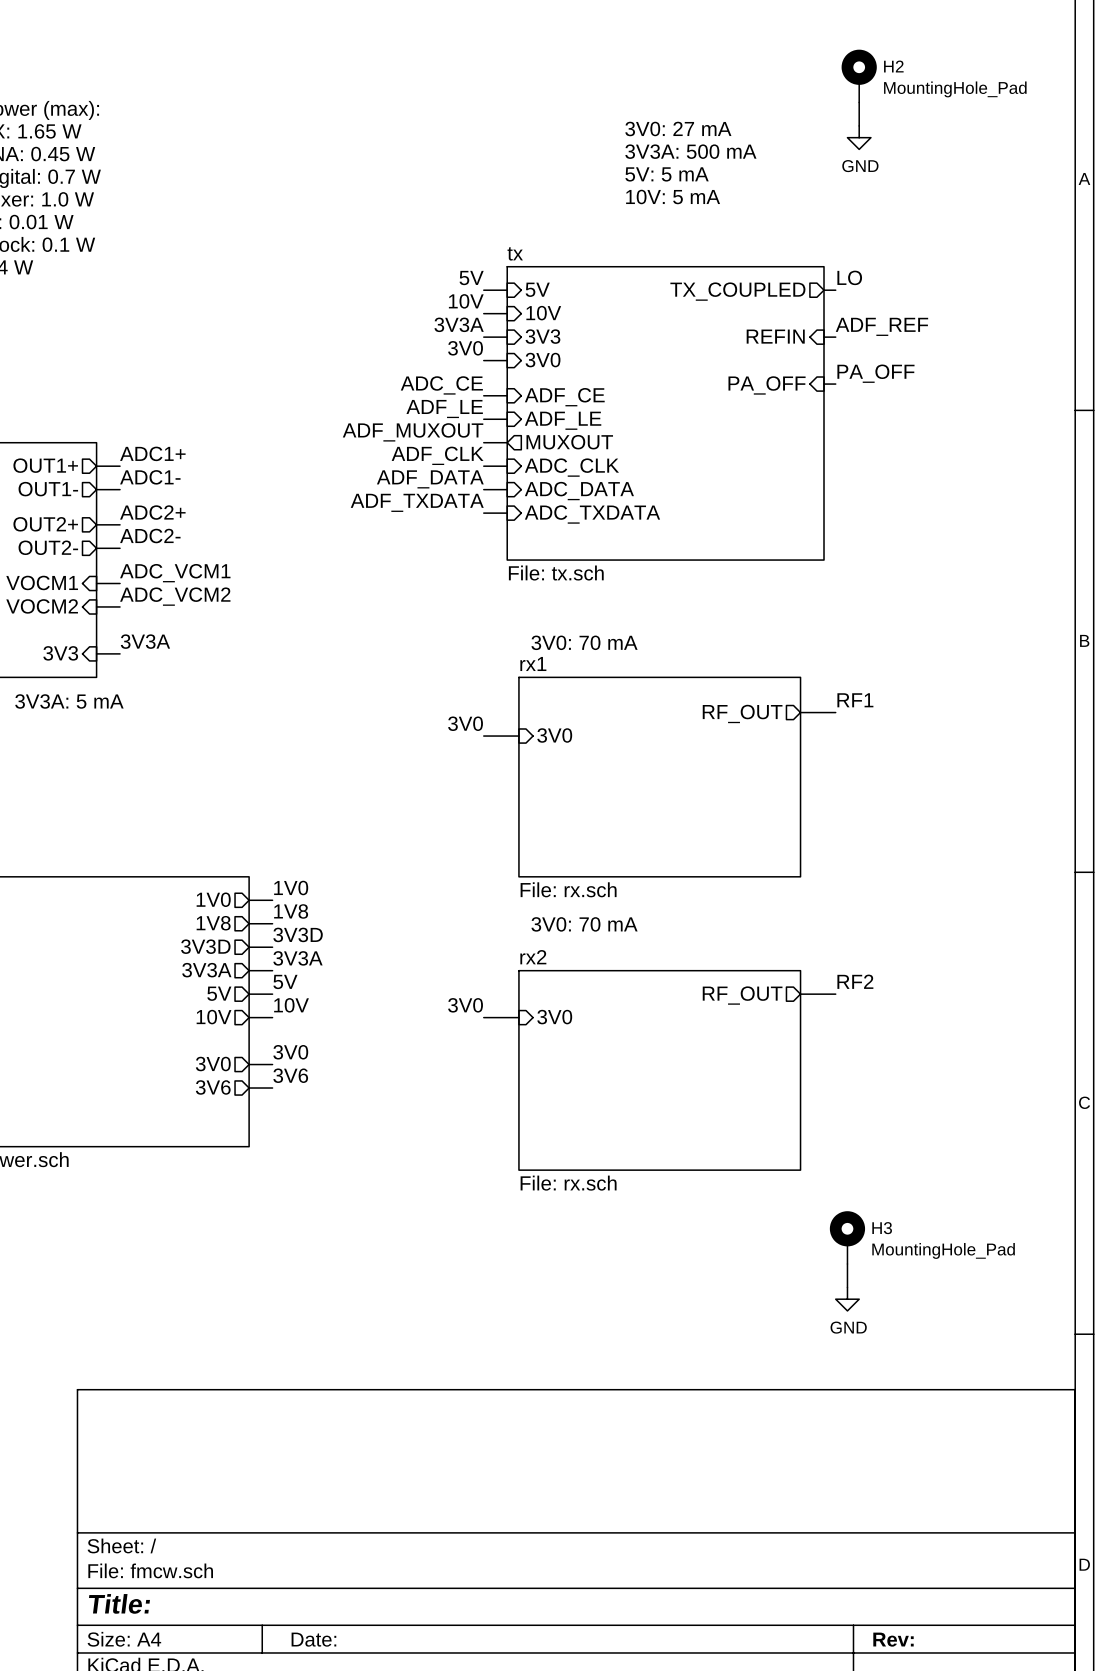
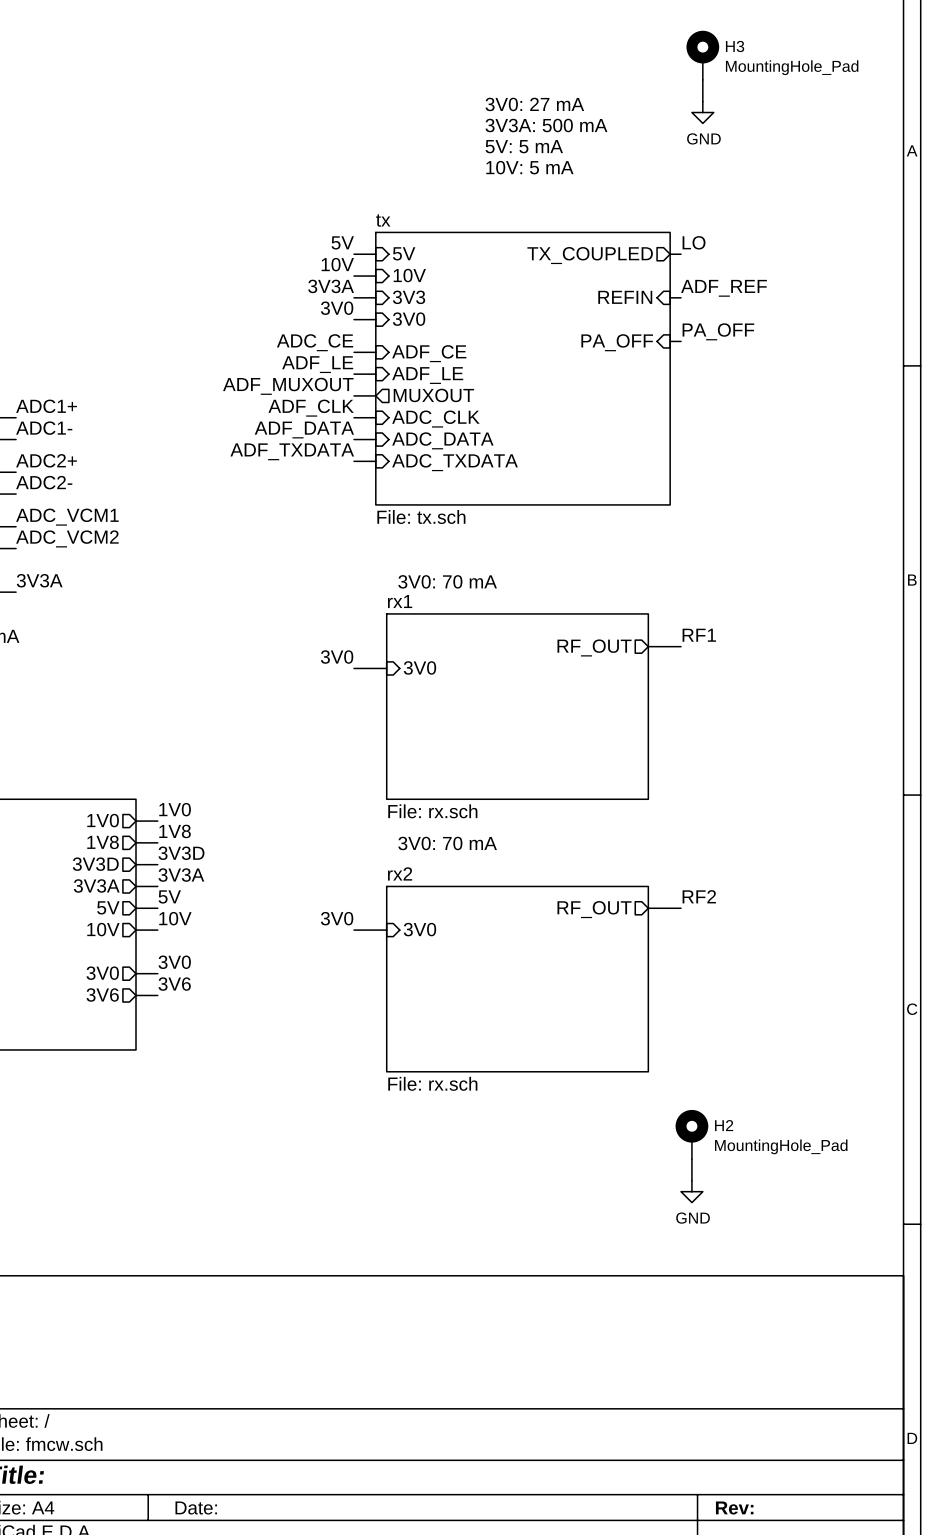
H2 name: H2 (893, 66) -> H3 (735, 46)
H3 name: H3 (882, 1228) -> H2 (724, 1125)

